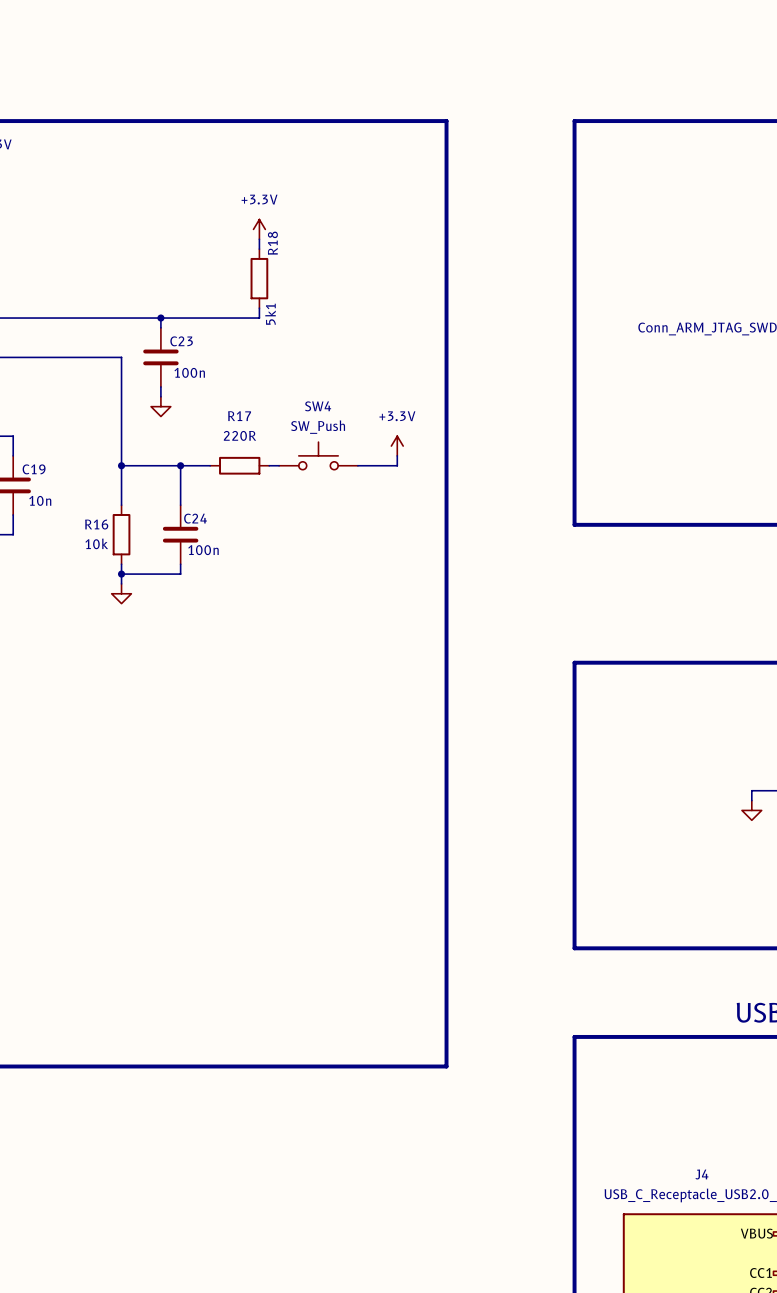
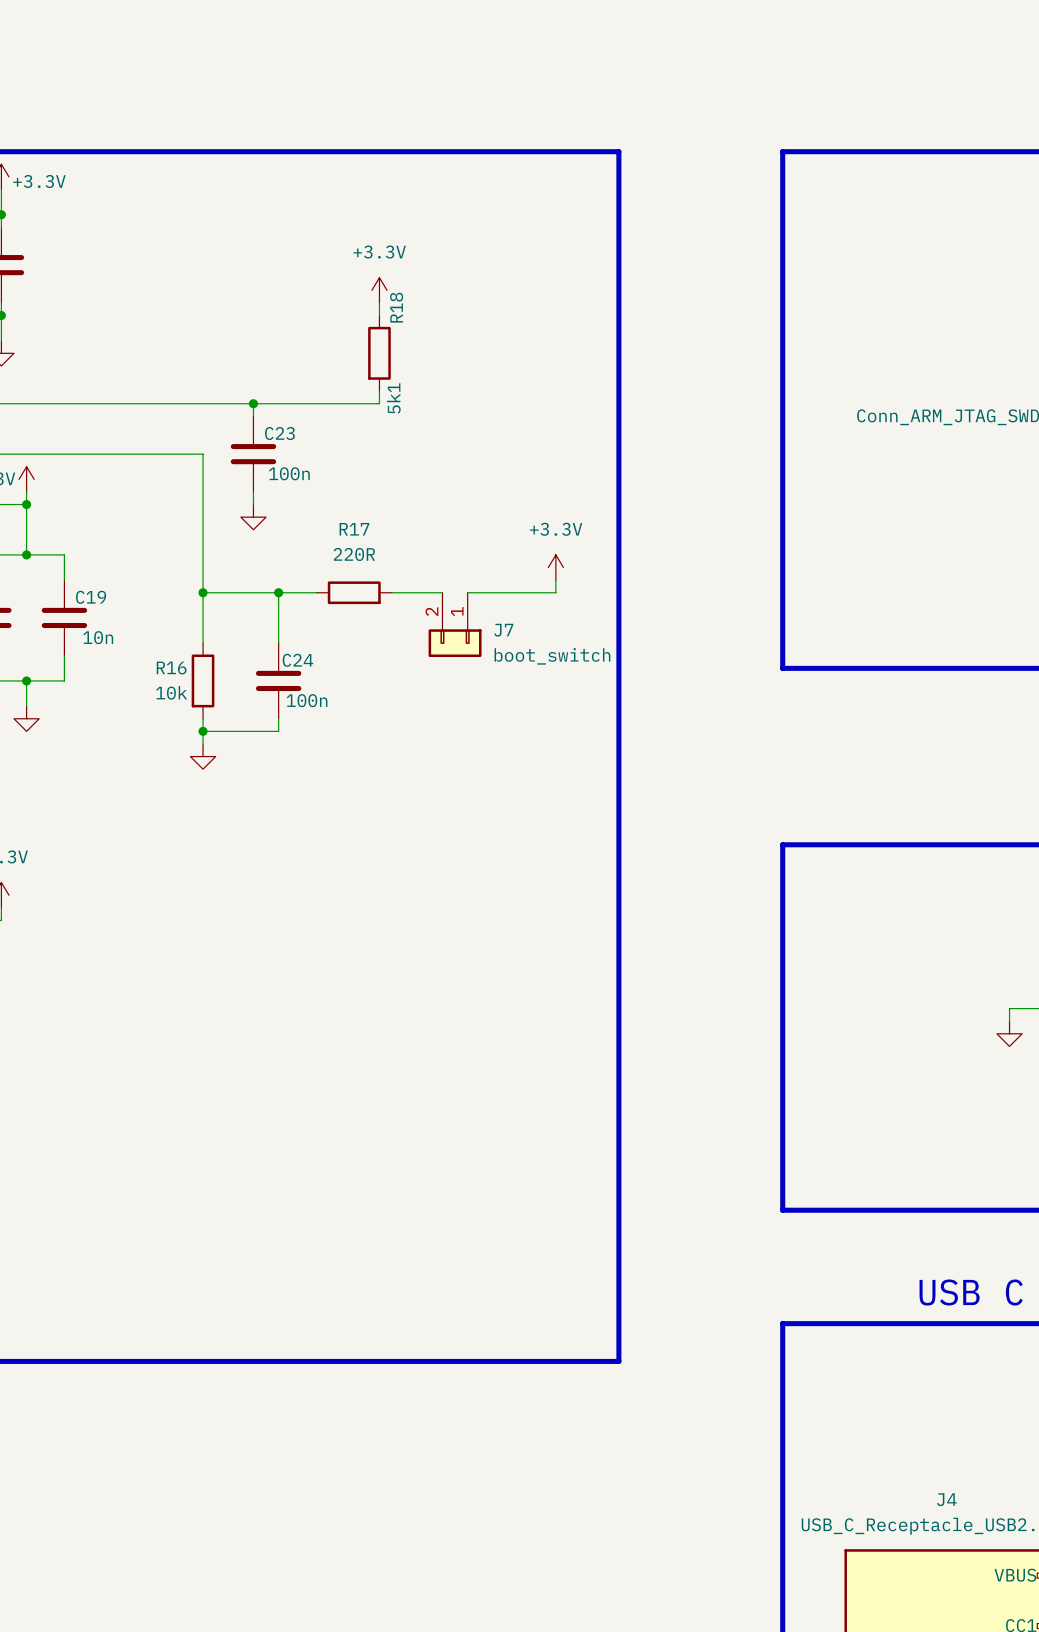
SW4: SW_Push (318, 455) -> none
J7: none -> boot_switch (455, 624)

